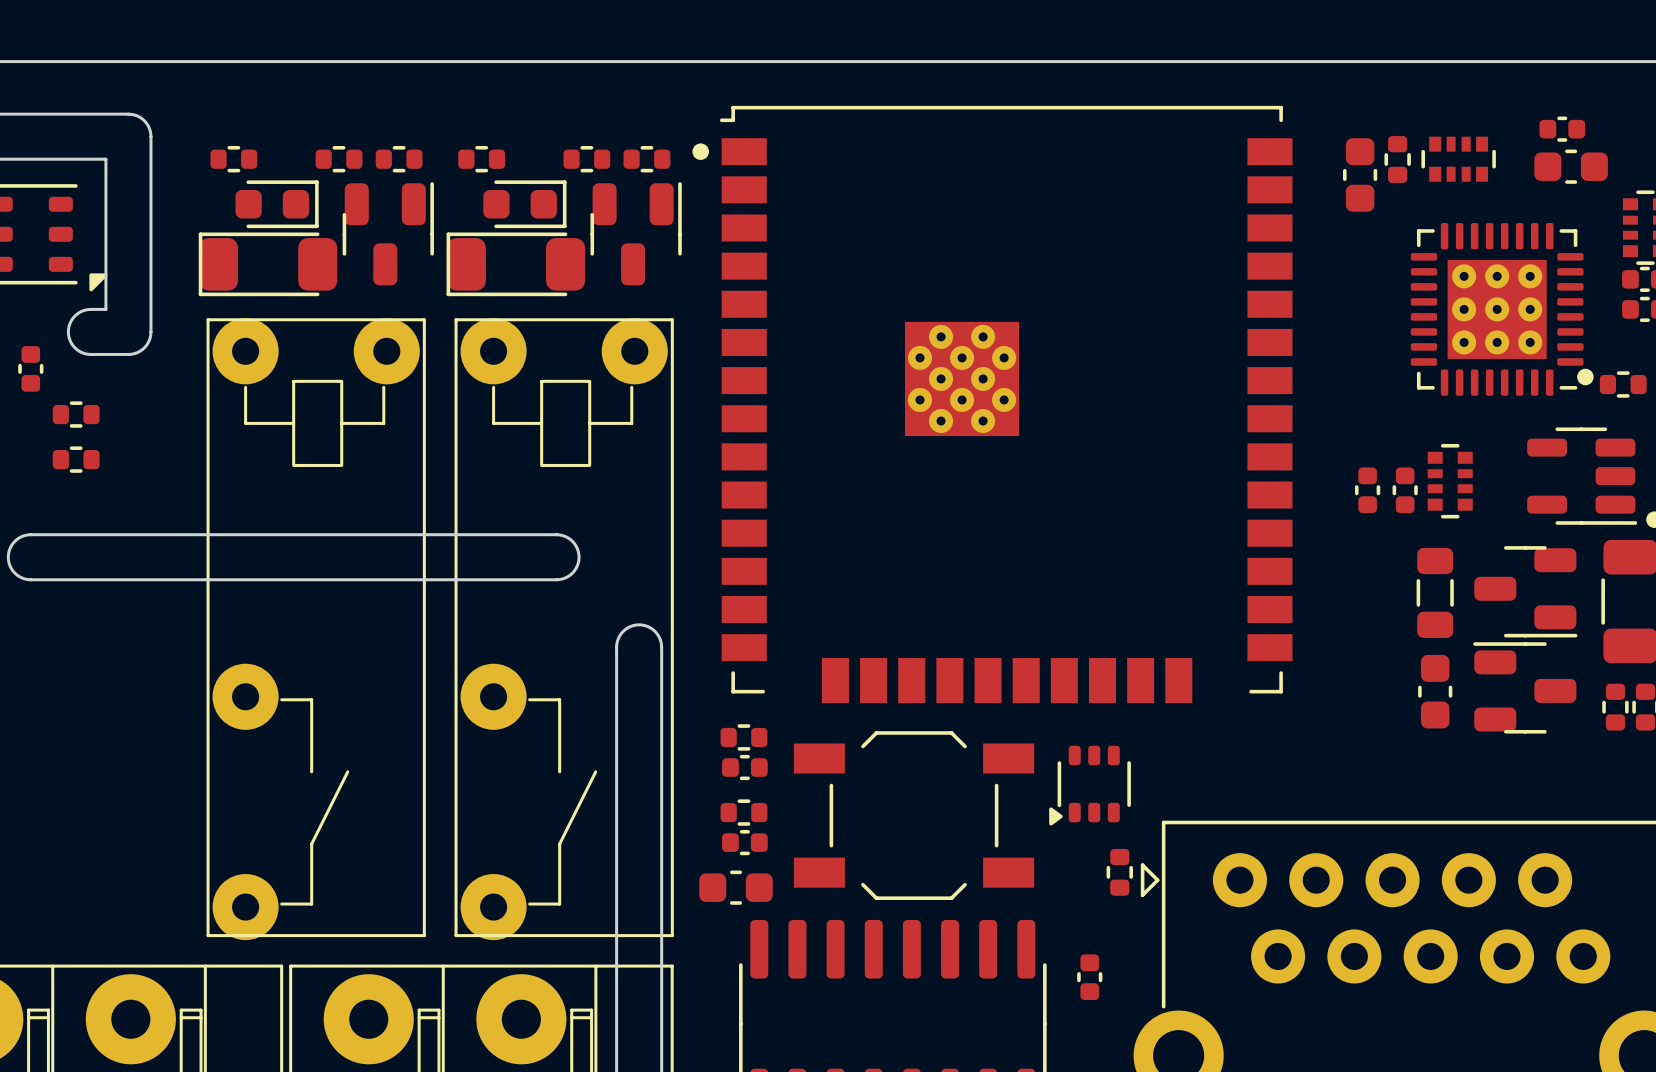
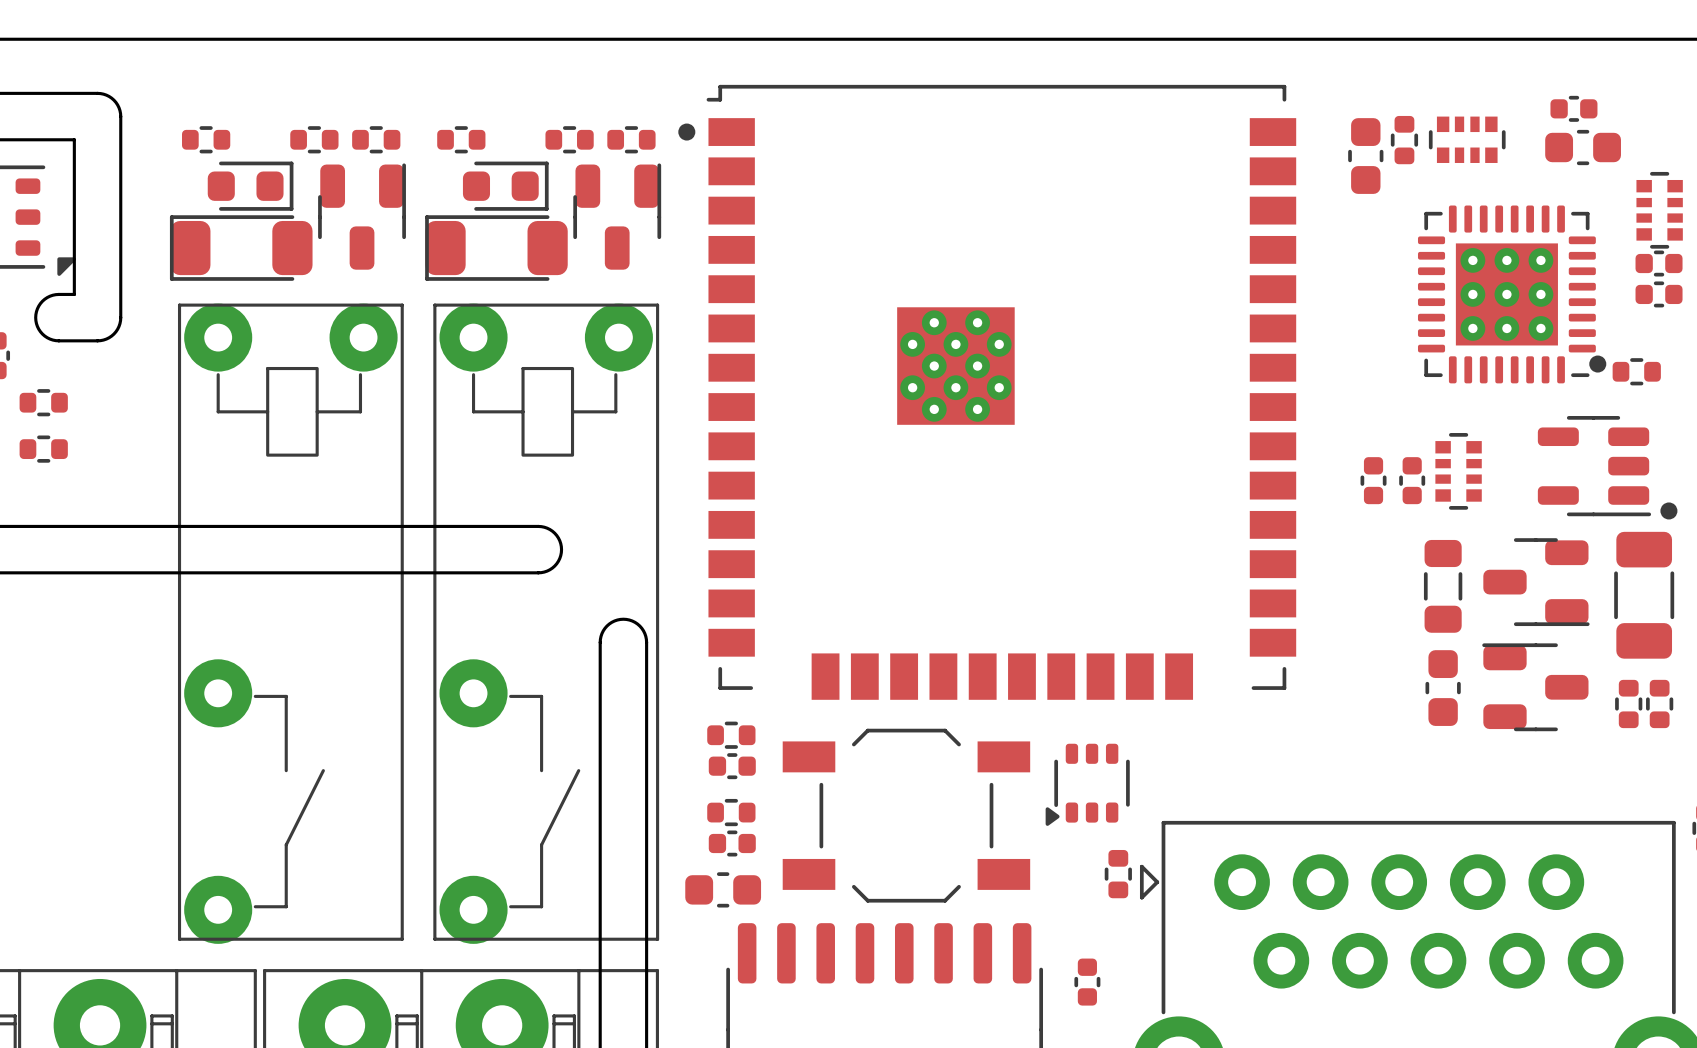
part footprint: [342, 182, 434, 286] -> [318, 163, 406, 270]
part footprint: [590, 182, 682, 286] -> [573, 163, 662, 270]
part footprint: [1474, 546, 1578, 638] -> [1483, 538, 1590, 627]
part footprint: [1473, 642, 1577, 734] -> [1482, 643, 1589, 732]

